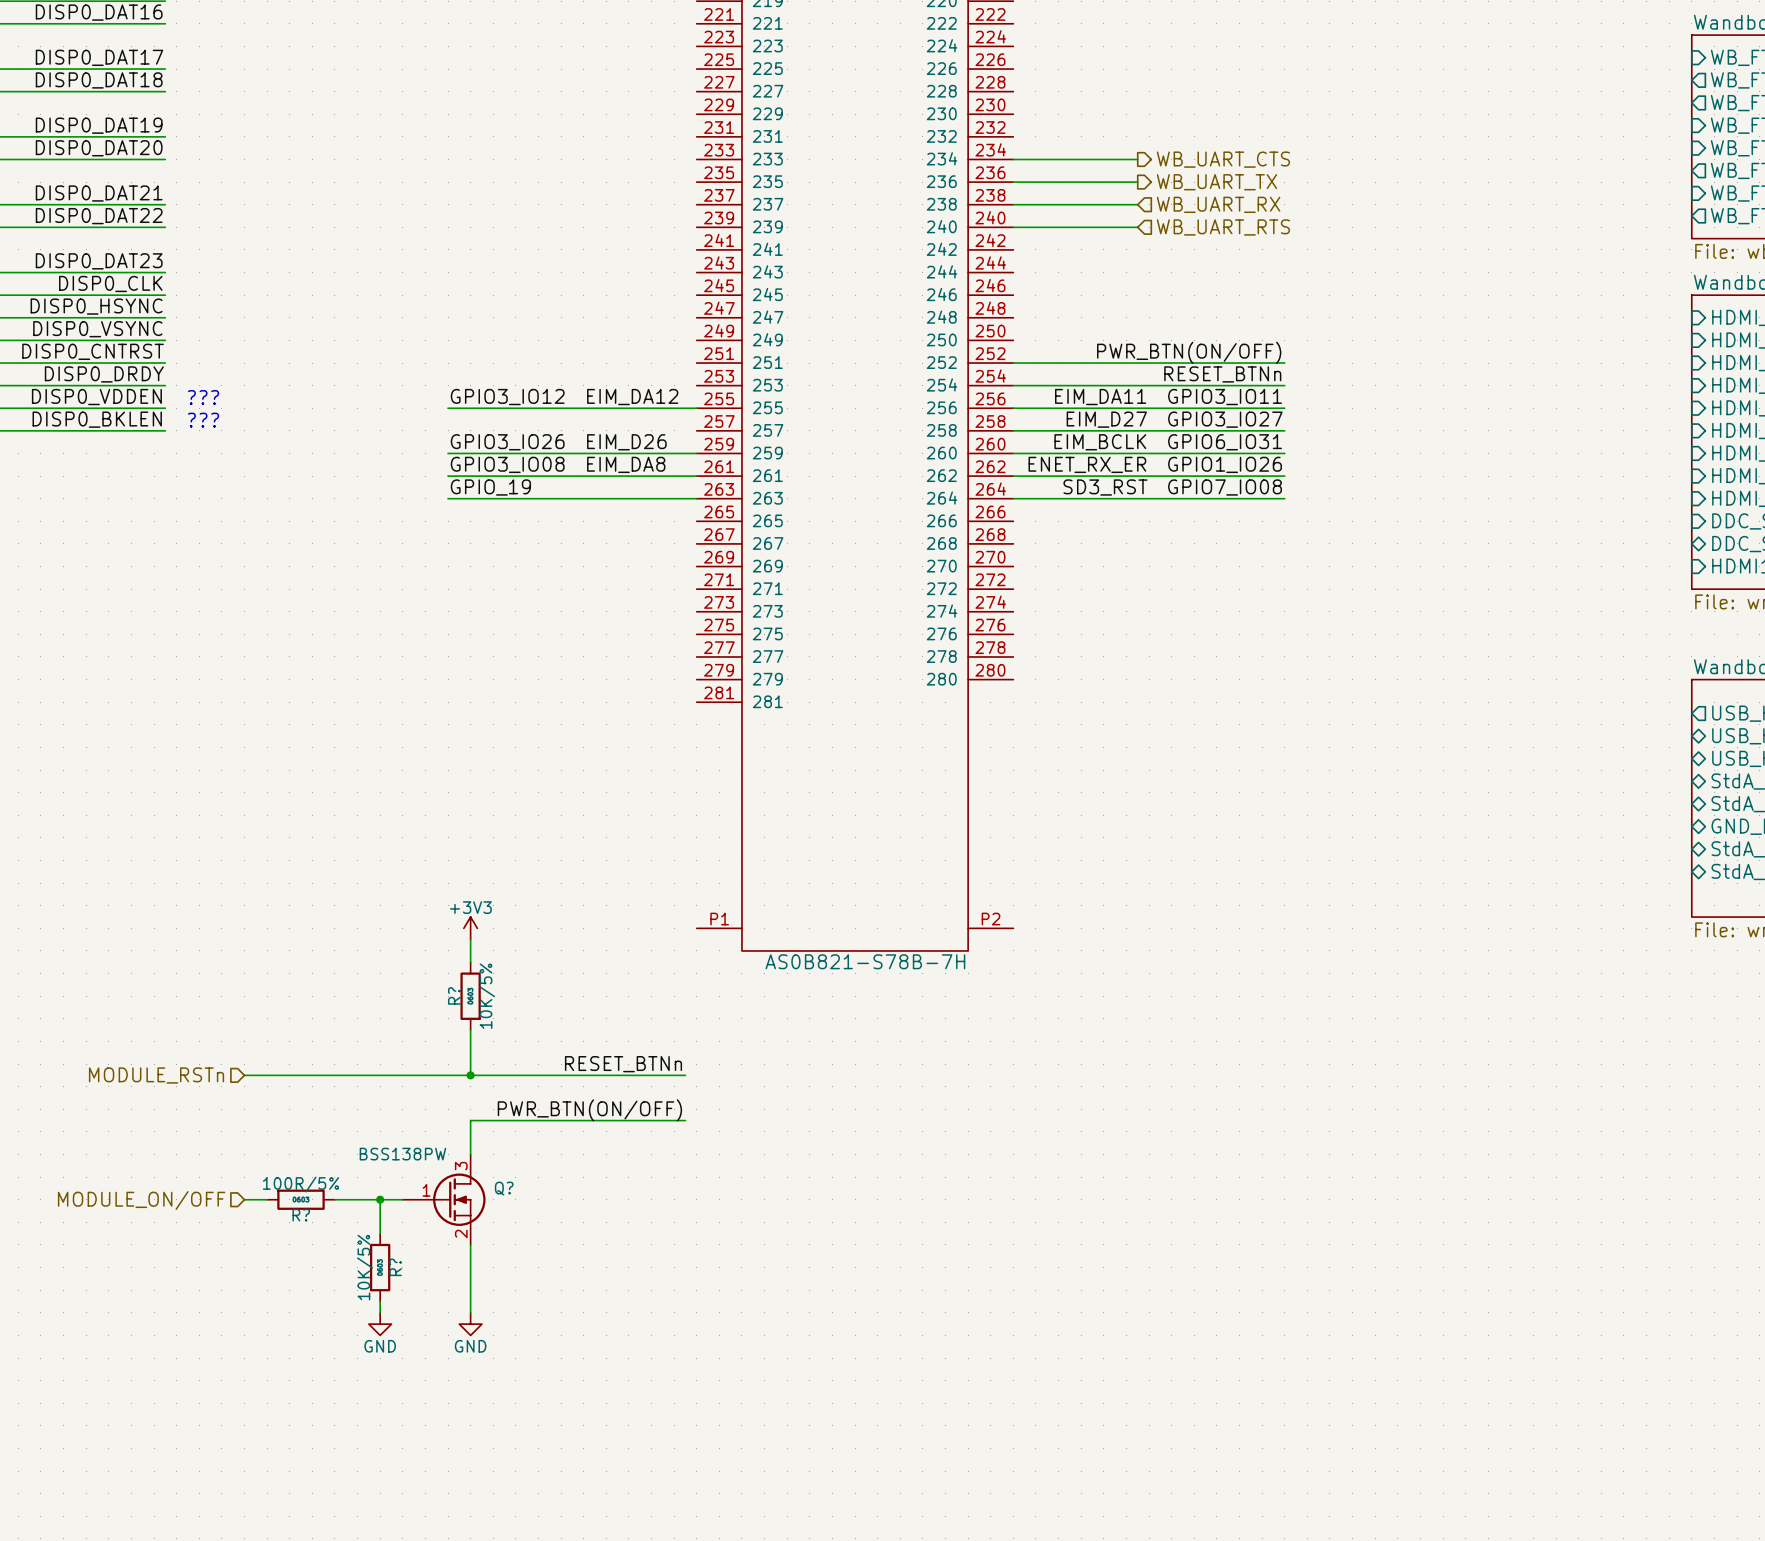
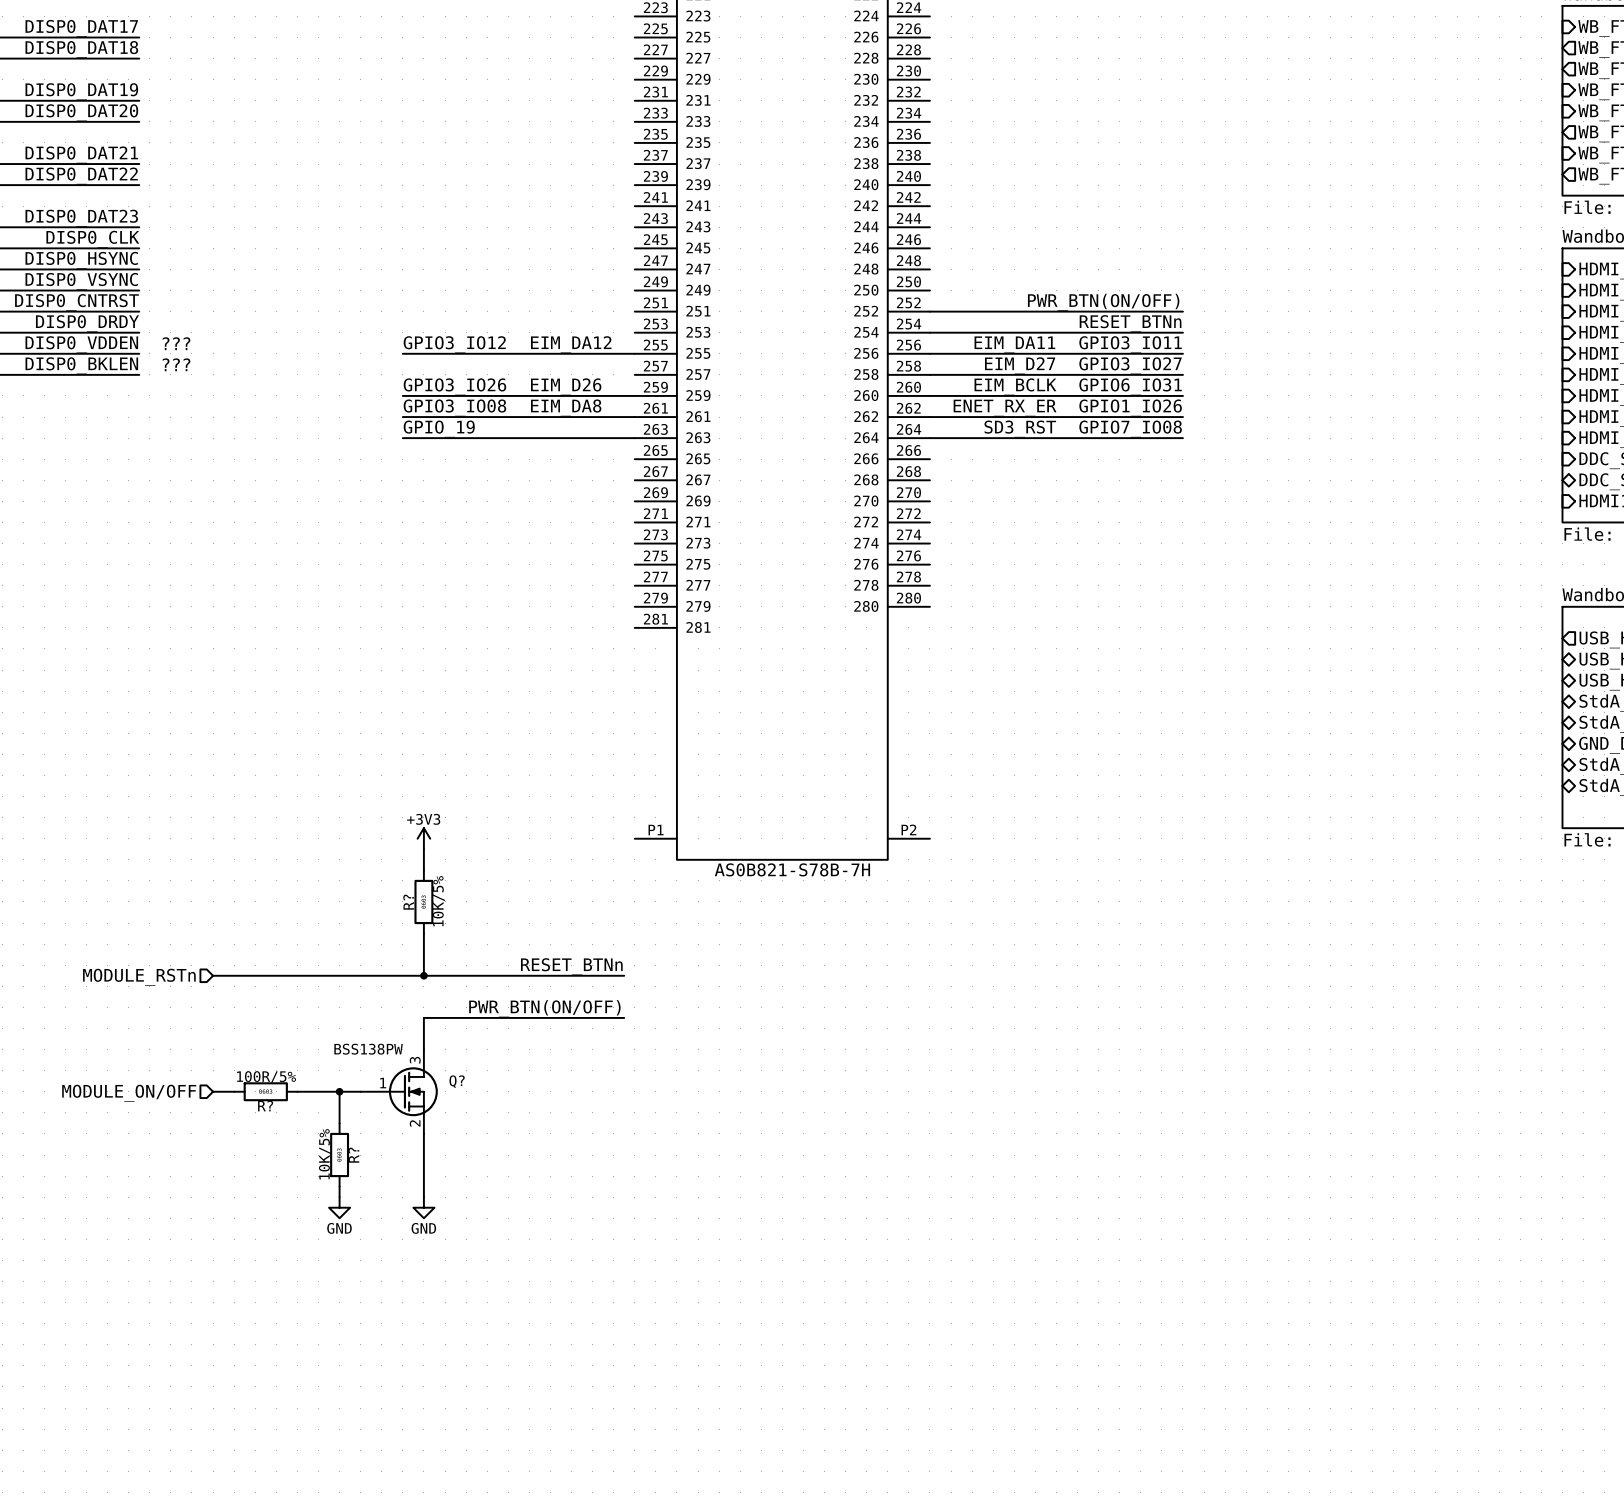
wire: (1013, 159) (1137, 159) -> none
hierarchical label: WB_UART_CTS (1223, 159) -> none
wire: (1013, 182) (1137, 182) -> none
hierarchical label: WB_UART_TX (1216, 182) -> none
wire: (1013, 204) (1137, 204) -> none
hierarchical label: WB_UART_RX (1218, 204) -> none
wire: (1013, 227) (1137, 227) -> none
hierarchical label: WB_UART_RTS (1223, 227) -> none

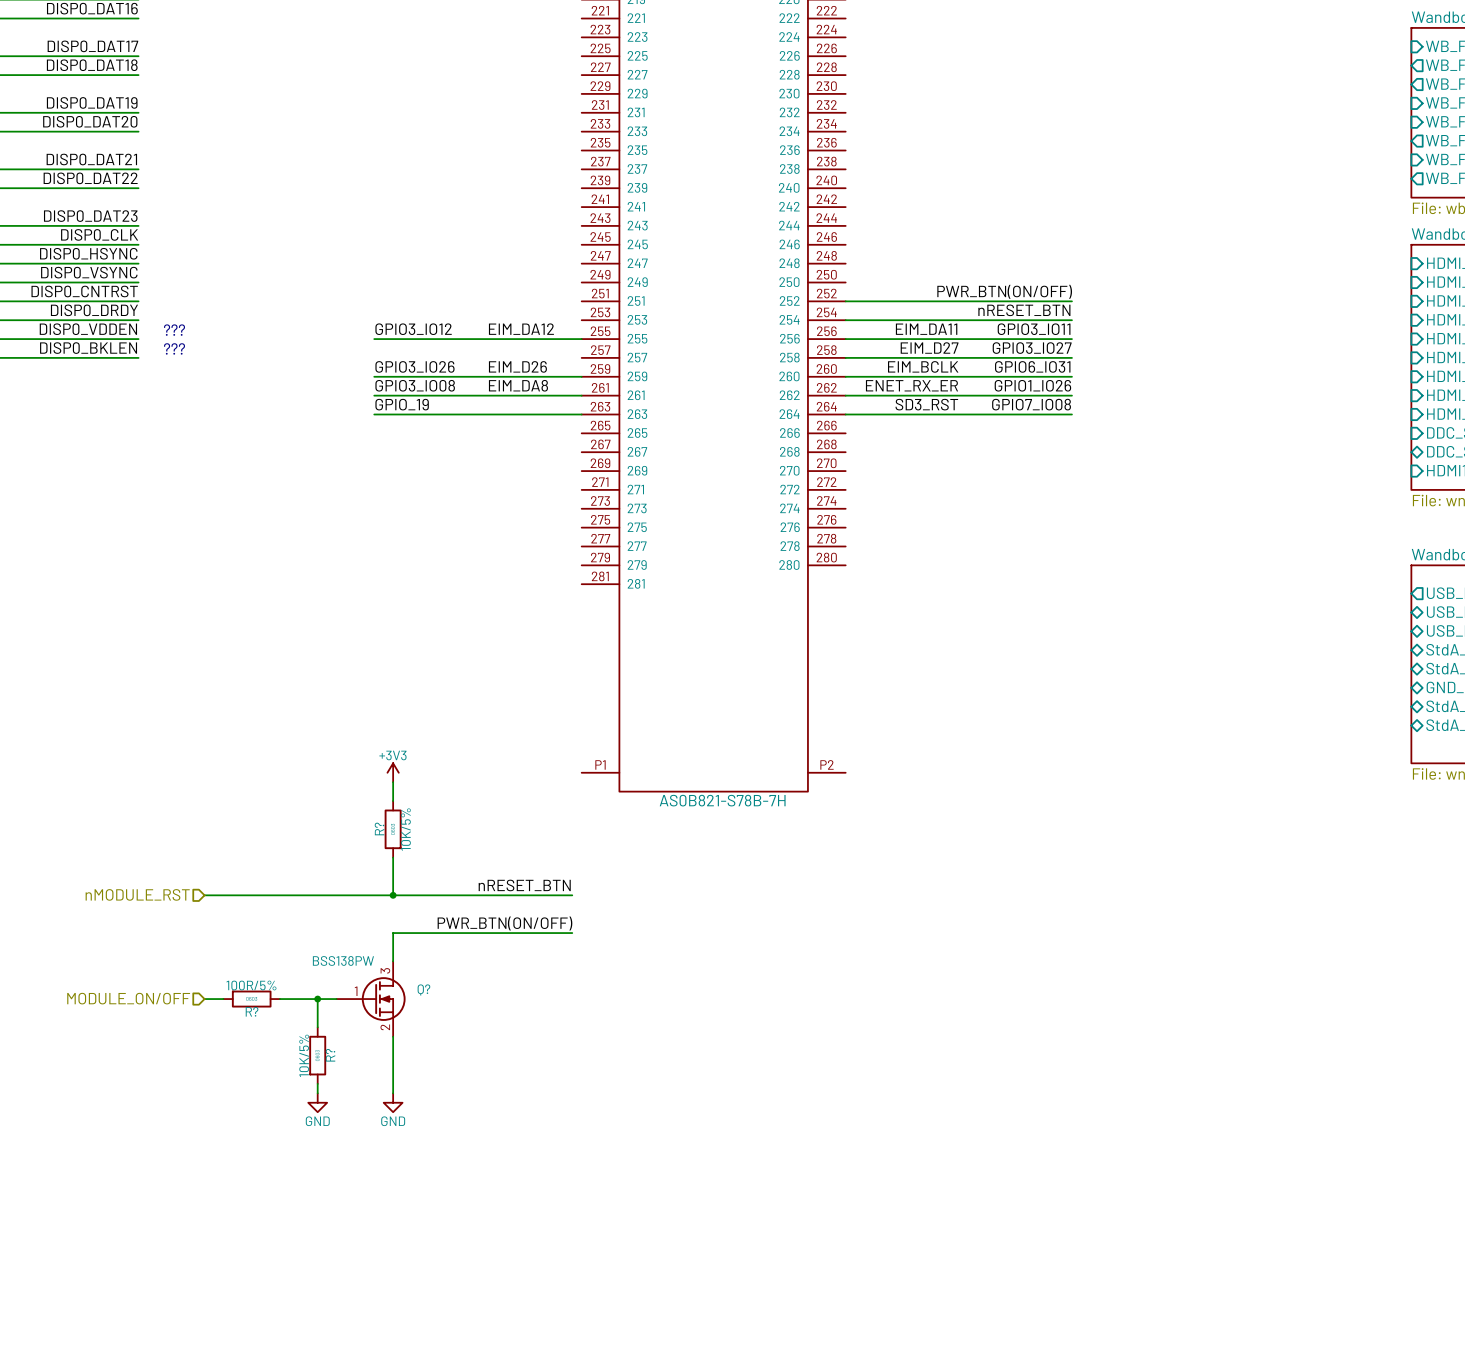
label: RESET_BTNn (1130, 323) -> nRESET_BTN (1024, 310)
label: RESET_BTNn (571, 966) -> nRESET_BTN (524, 885)
hierarchical label: MODULE_RSTn (139, 977) -> nMODULE_RST (137, 894)

